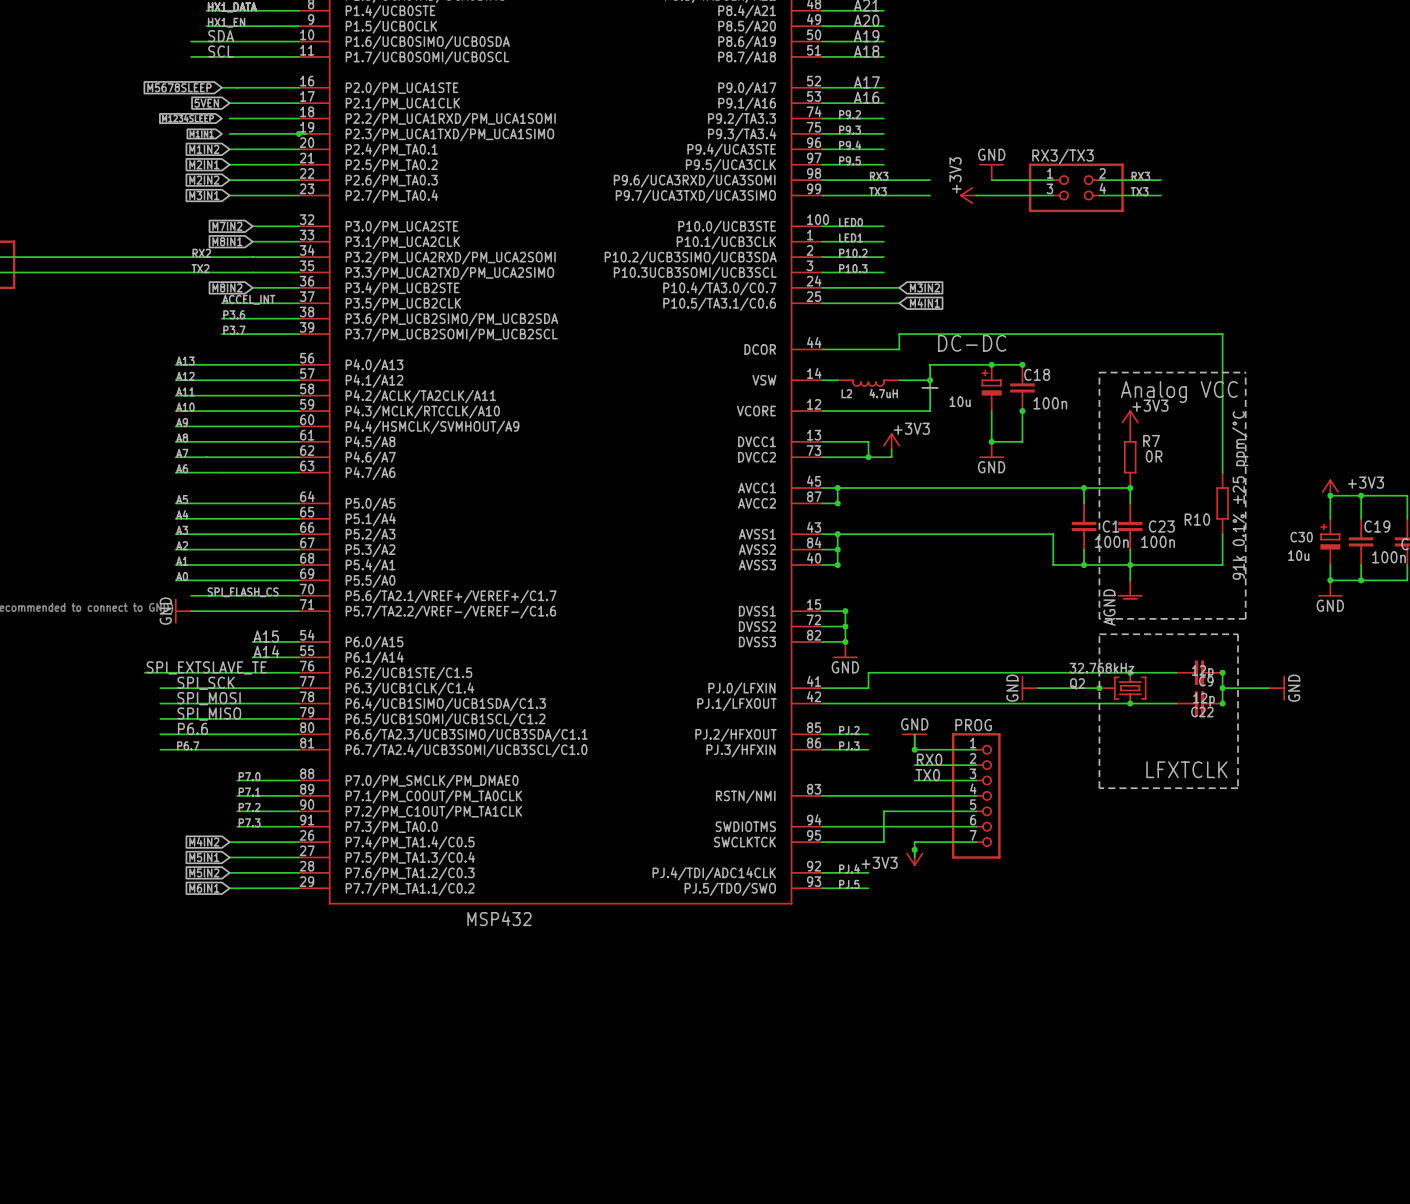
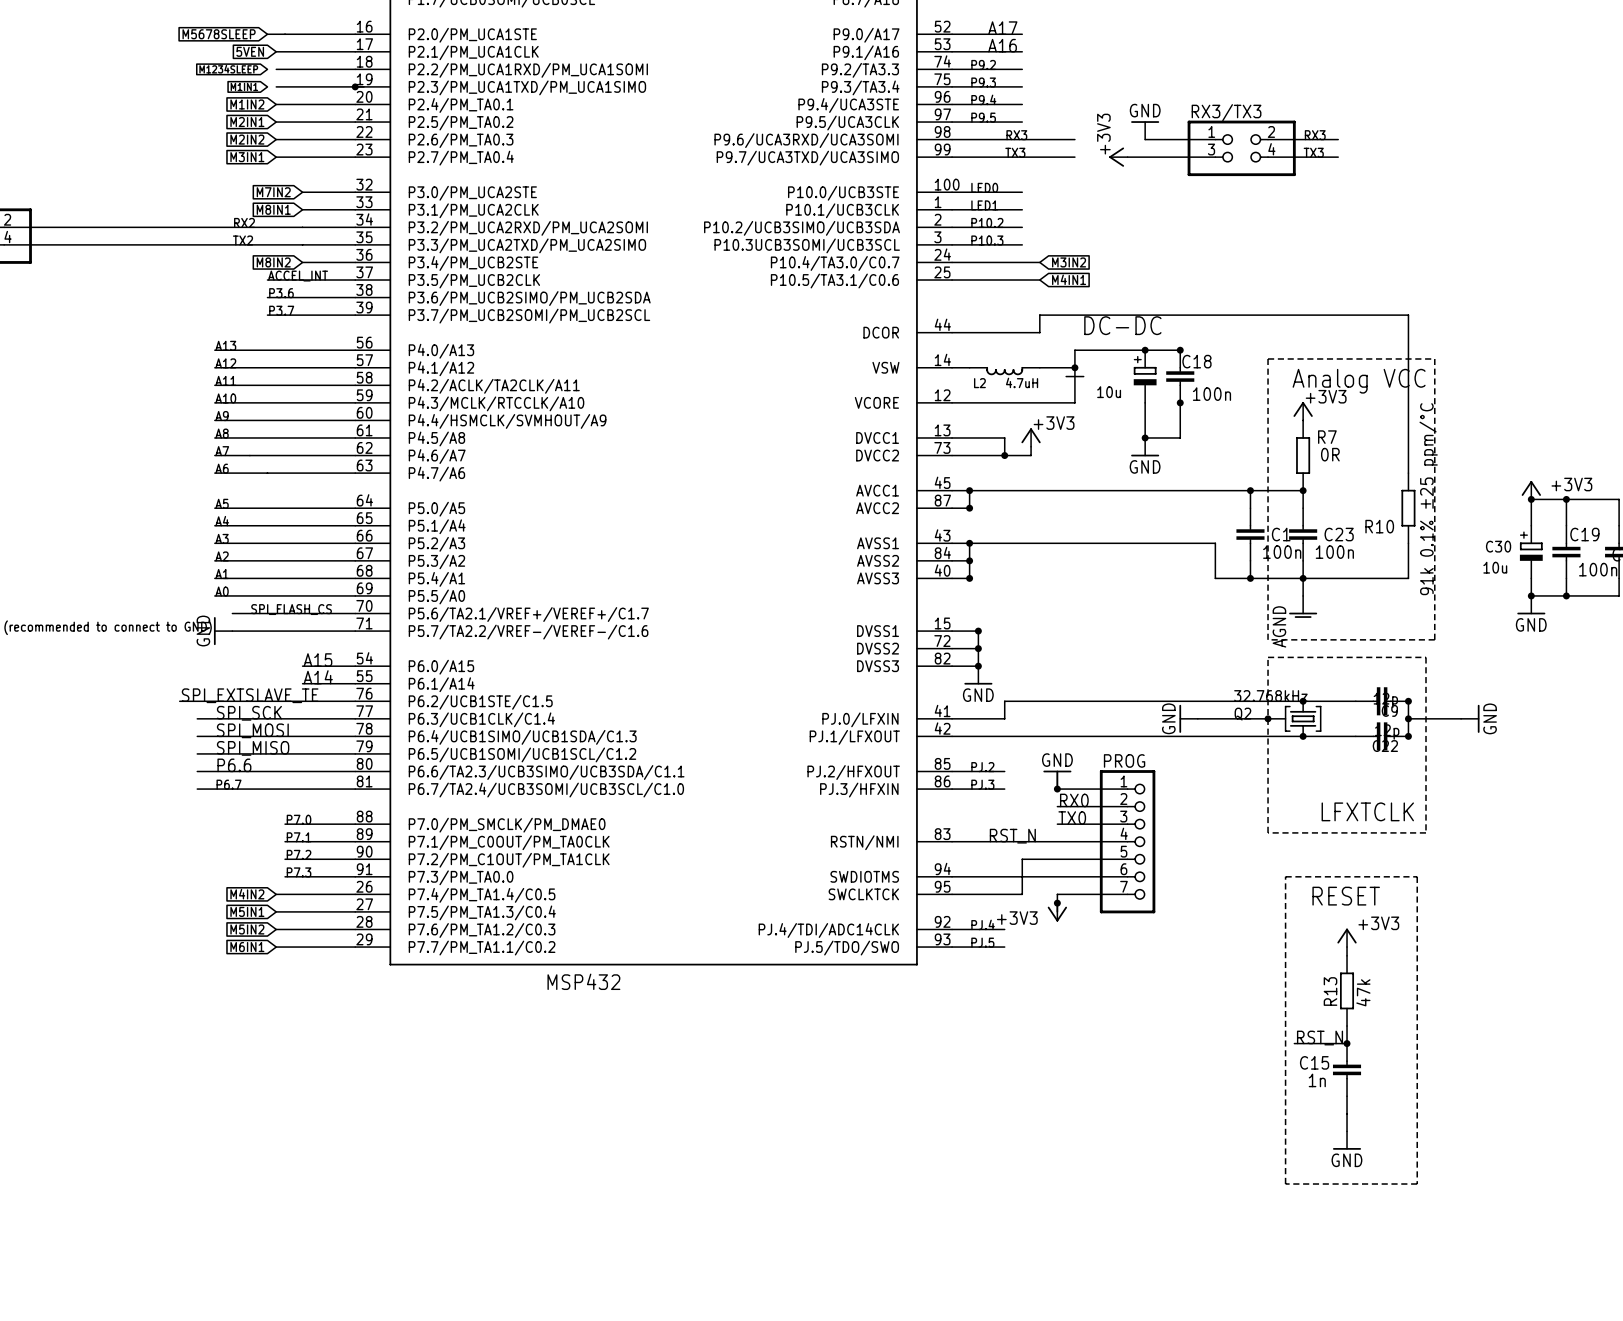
label: none -> RST_N (1012, 836)
line: none -> (1285, 876) (1285, 1184) (1417, 1184) (1417, 876) (1285, 876)
text: none -> RESET (1346, 896)
power symbol: none -> +3V3 (1347, 937)
wire: none -> (1347, 947) (1347, 955)
R13: none -> 47k (1347, 990)
wire: none -> (1347, 1026) (1347, 1043) (1294, 1043)
label: none -> RST_N (1320, 1038)
junction: none -> (1347, 1043)
C15: none -> 1n (1347, 1069)
wire: none -> (1347, 1096) (1347, 1131)
power symbol: none -> GND (1347, 1140)

